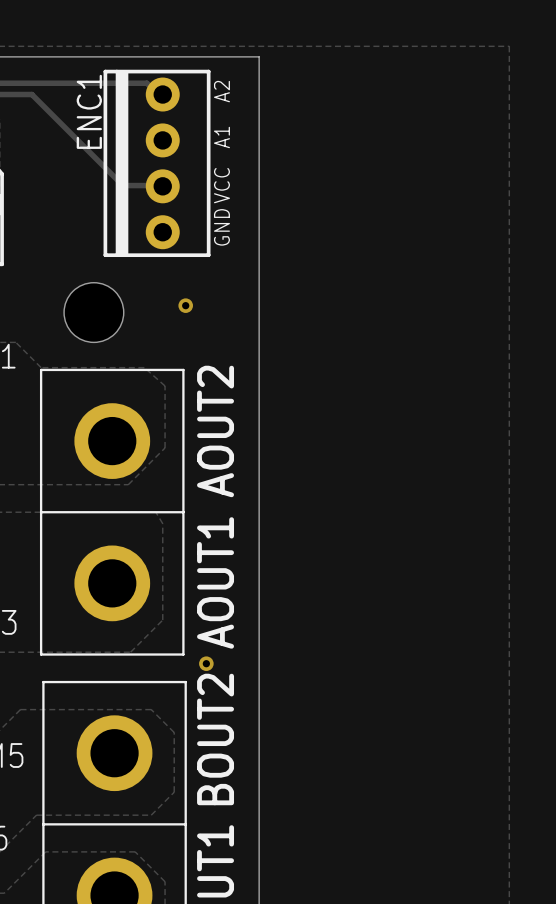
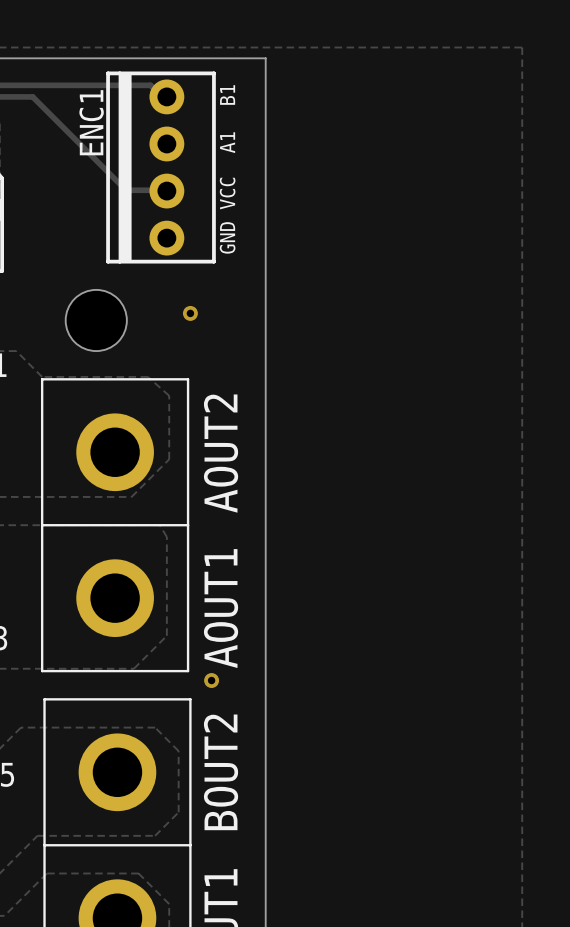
text: A2 (221, 91) -> B1 (227, 95)

